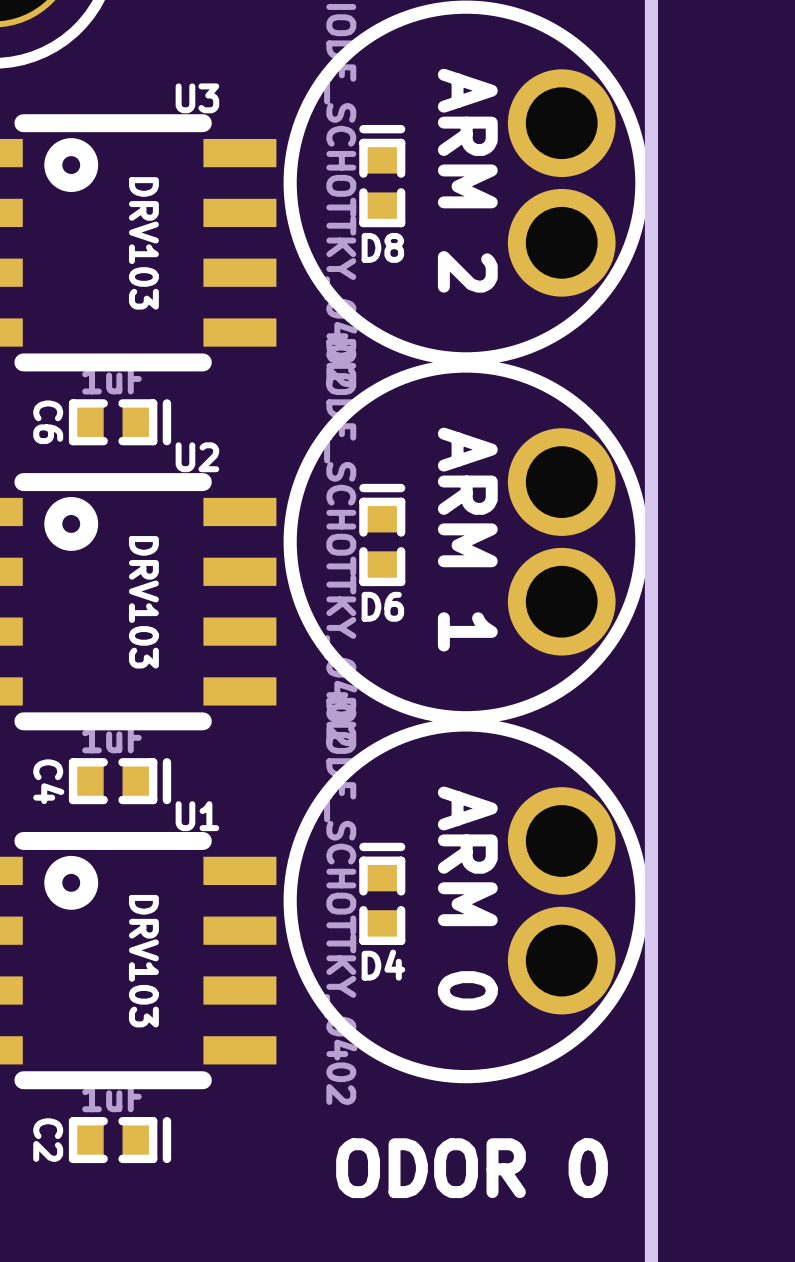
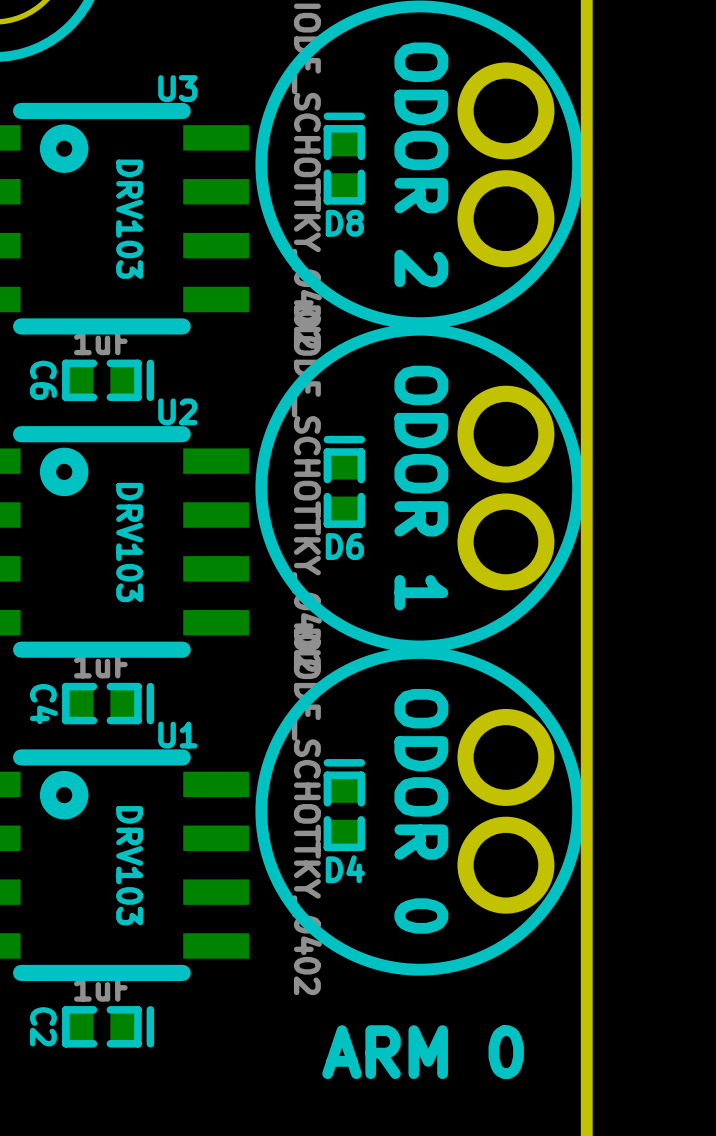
text: ARM 2 (467, 180) -> ODOR 2 (421, 164)
text: ARM 1 (467, 539) -> ODOR 1 (421, 488)
text: ARM 0 (467, 898) -> ODOR 0 (421, 811)
text: ODOR 0 (472, 1168) -> ARM 0 (423, 1052)

